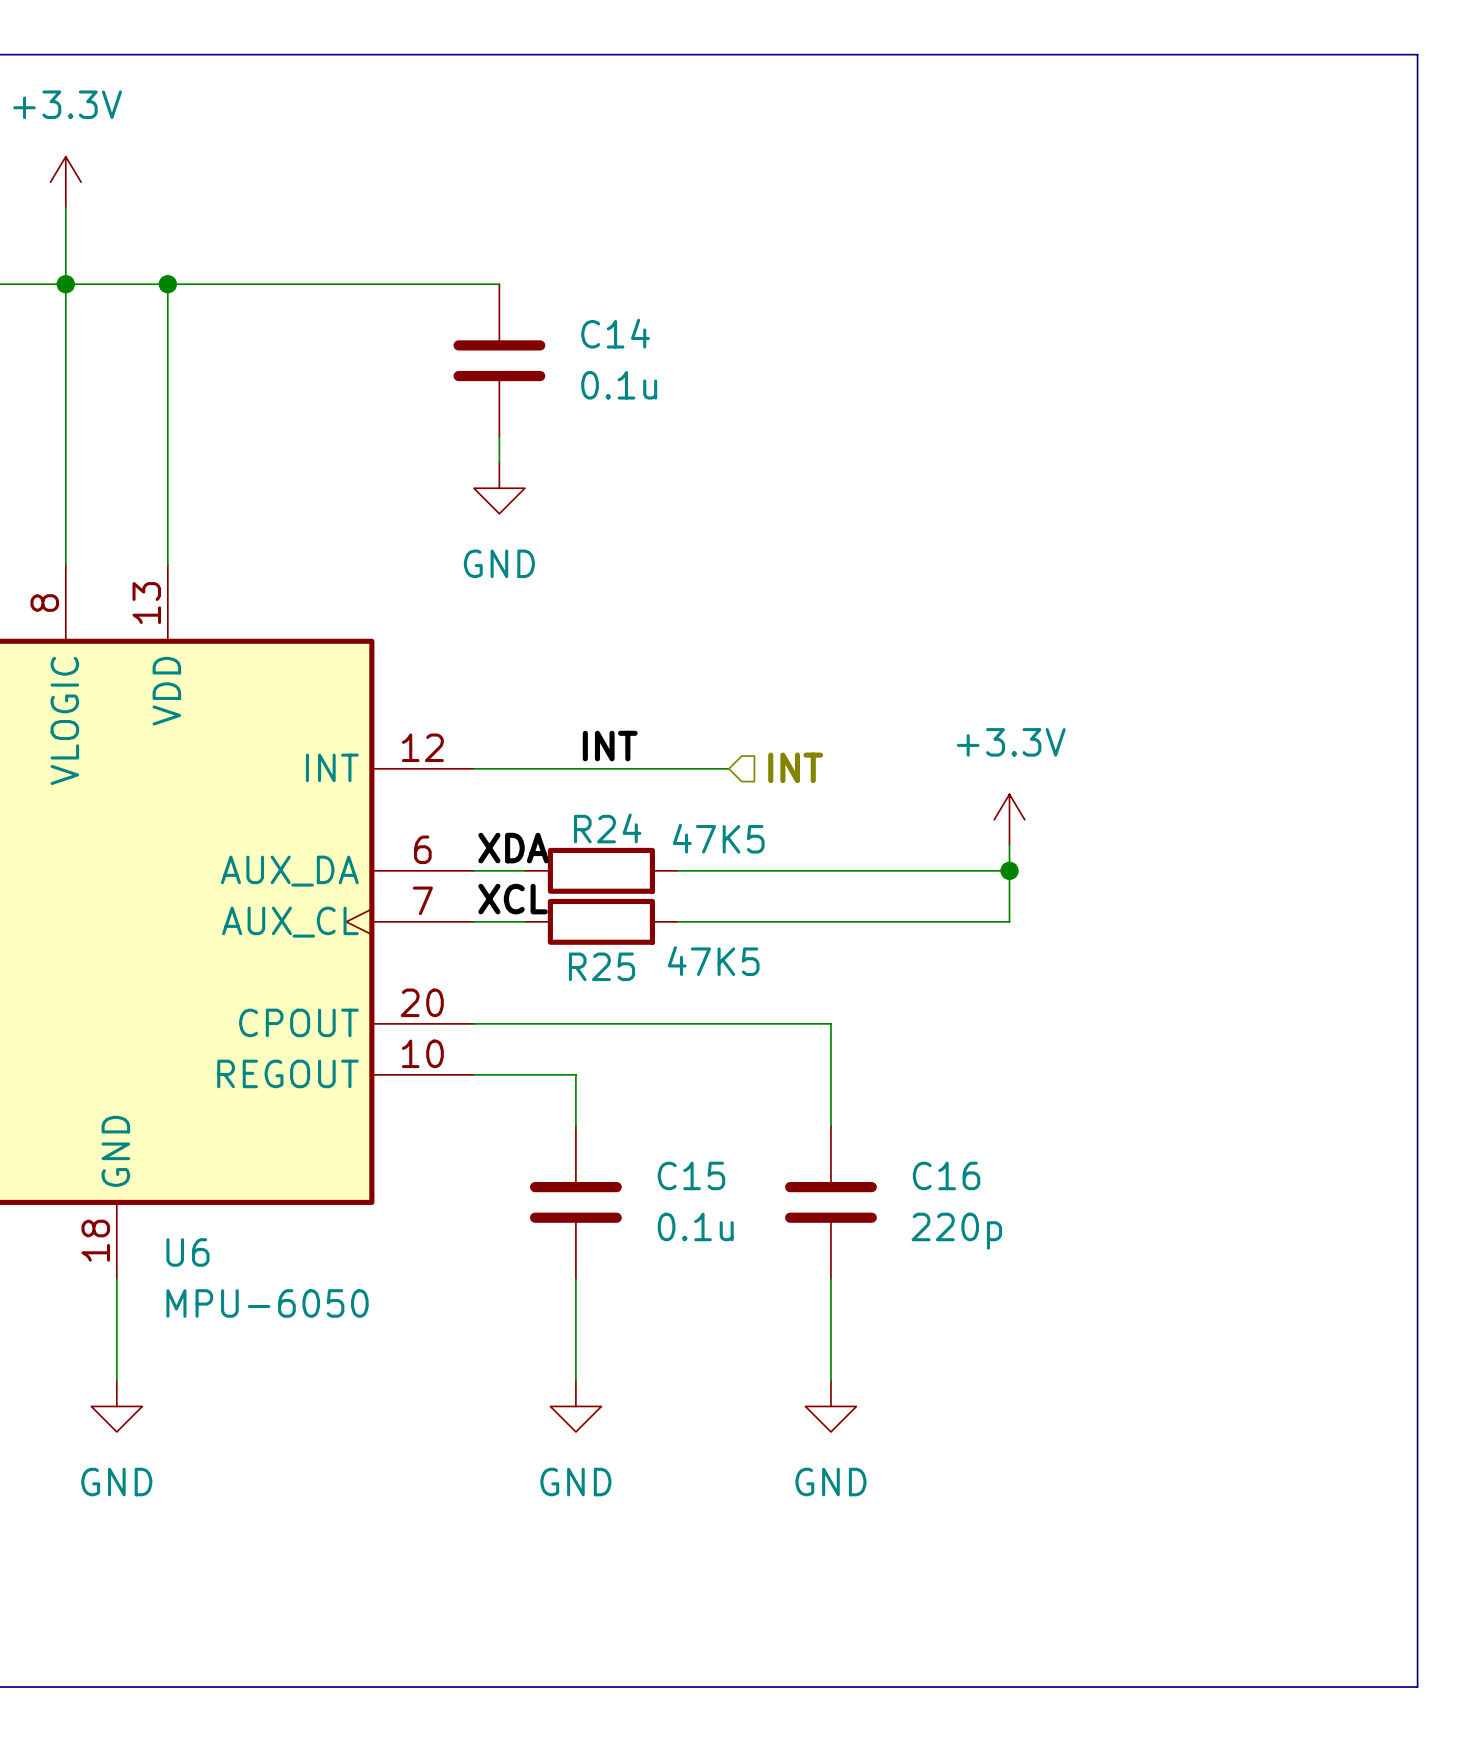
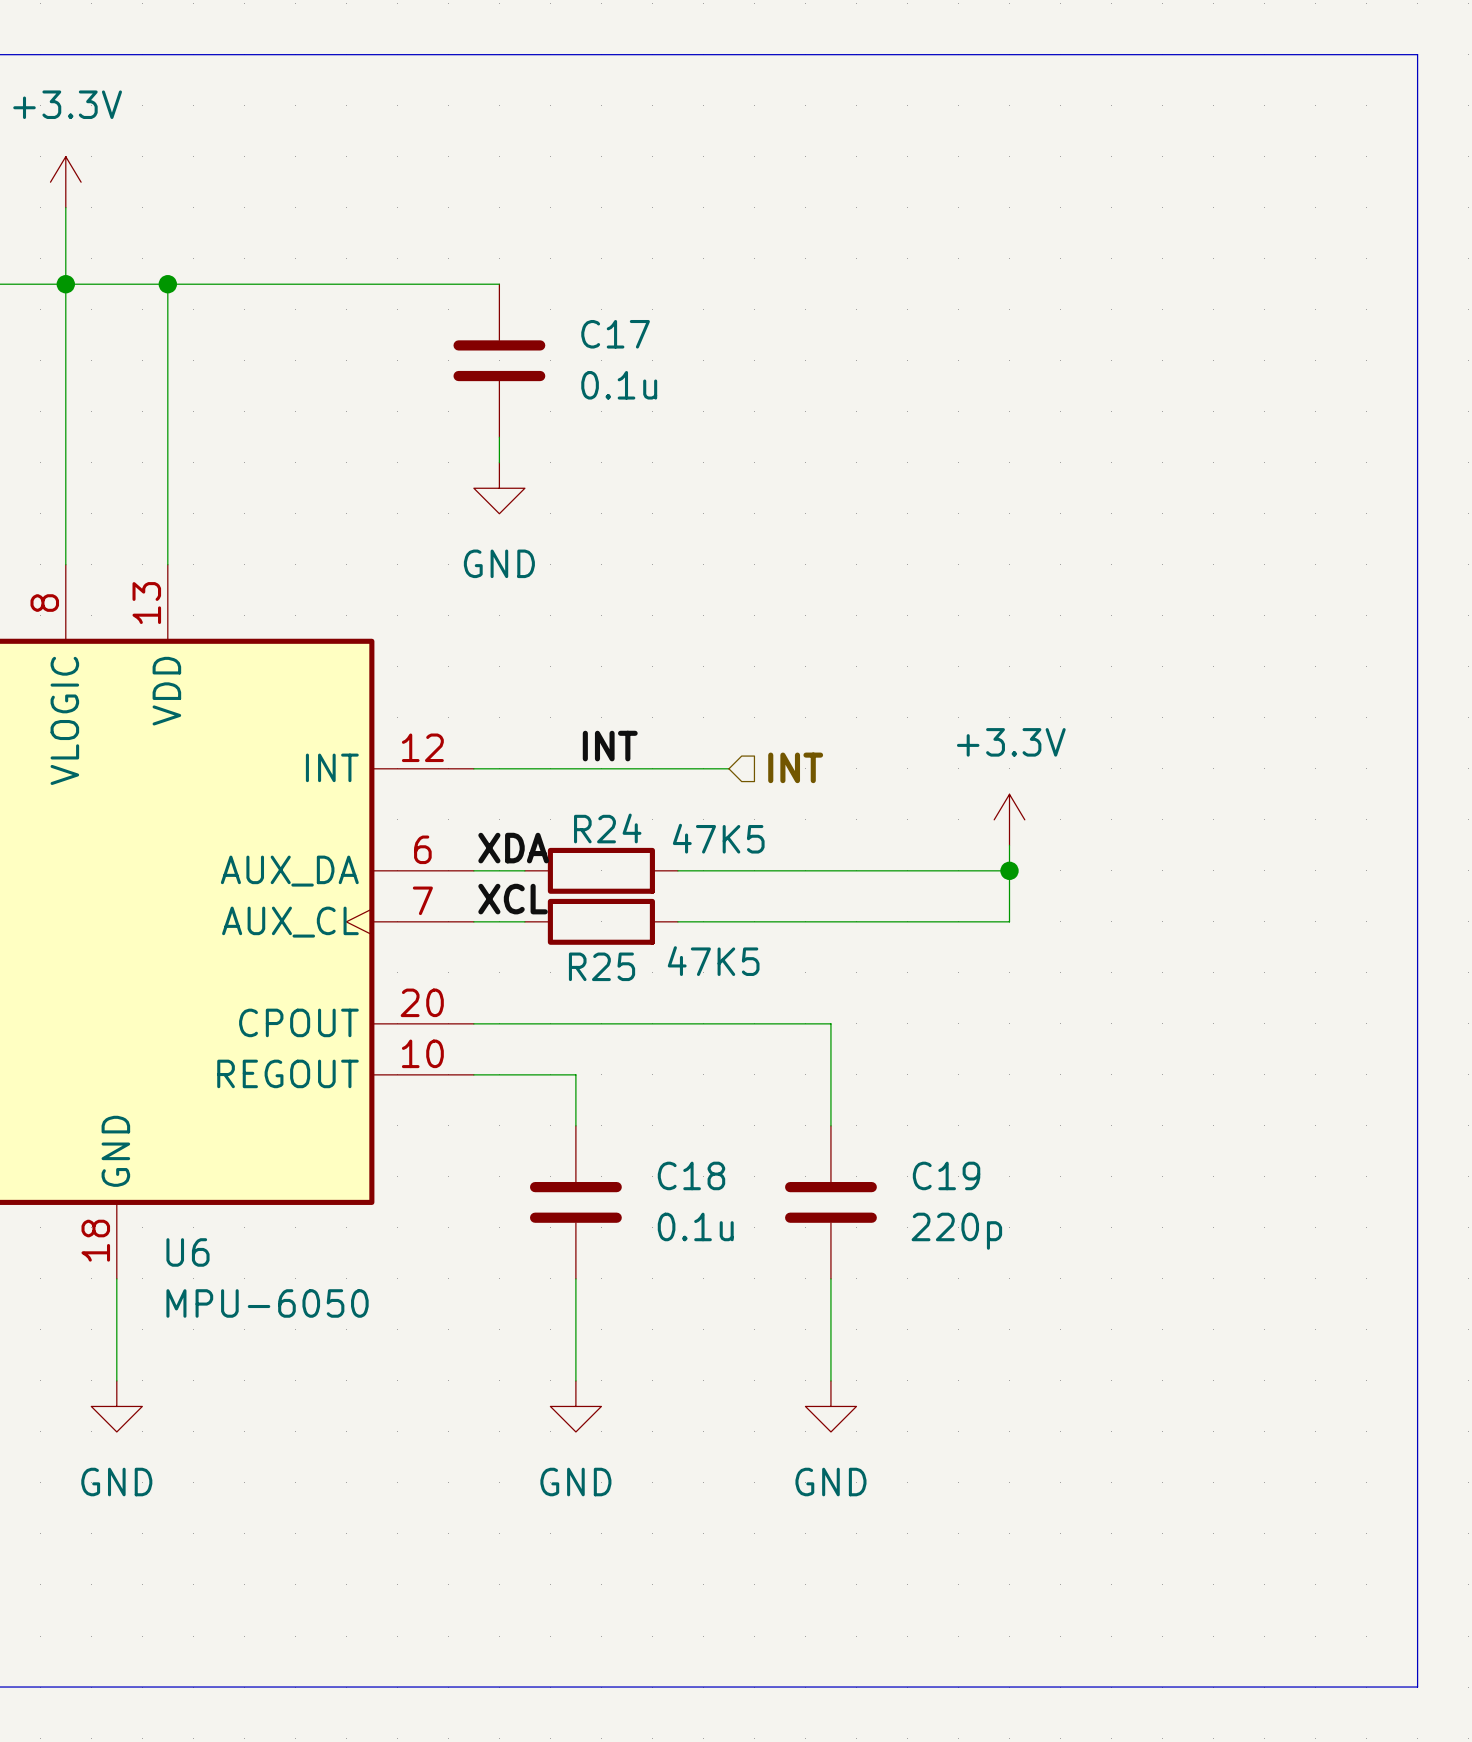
C14 name: C14 (615, 333) -> C17 (615, 334)
C15 name: C15 (691, 1175) -> C18 (691, 1175)
C16 name: C16 (946, 1175) -> C19 (946, 1175)

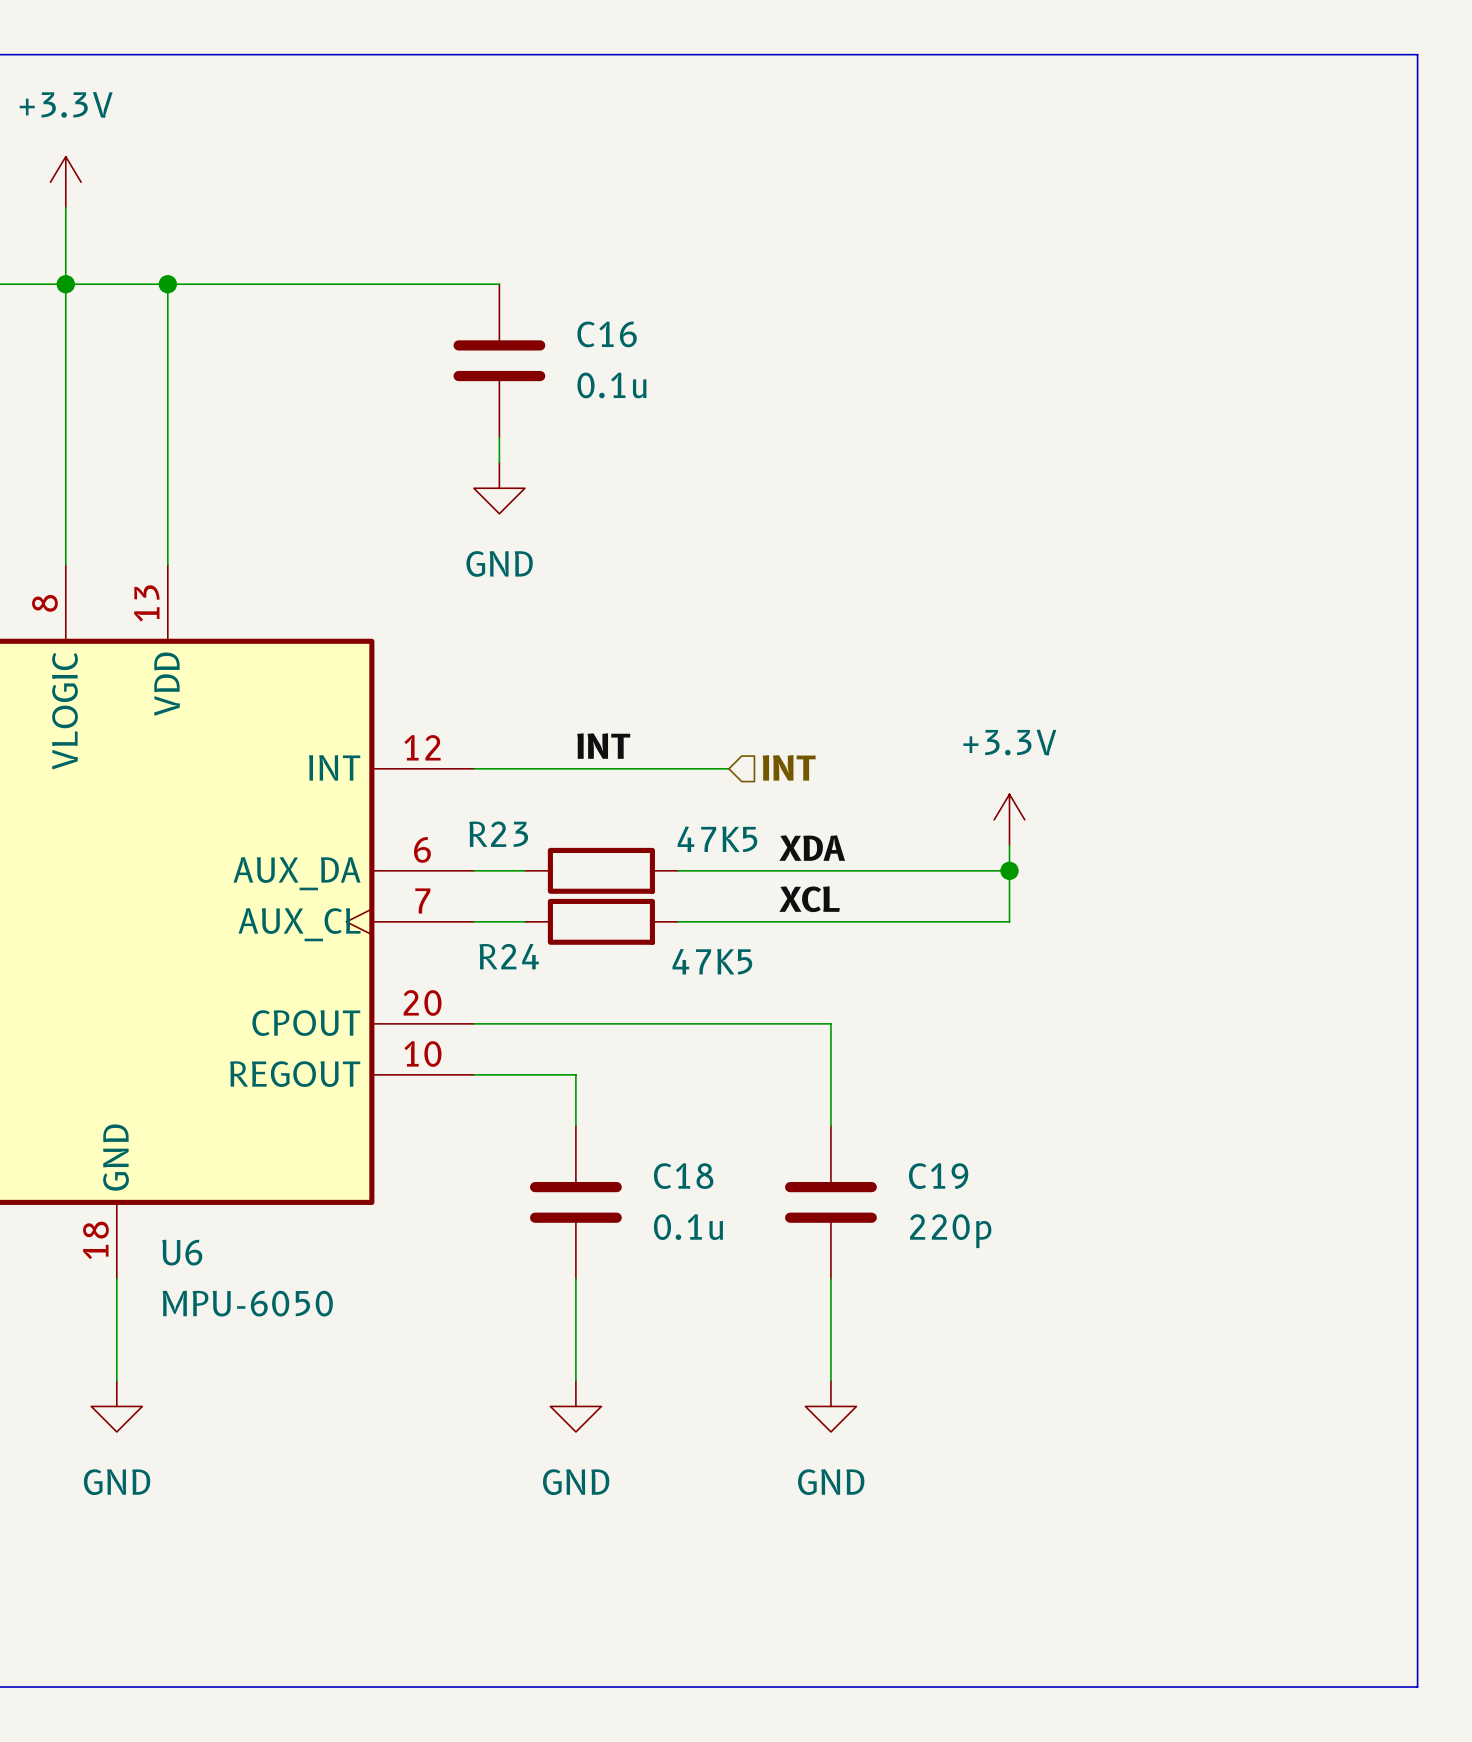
C17 name: C17 (615, 334) -> C16 (607, 334)
R24 name: R24 (607, 828) -> R23 (498, 834)
label position: XDA (513, 848) -> XDA (812, 848)
label position: XCL (513, 899) -> XCL (809, 899)
R25 name: R25 (602, 966) -> R24 (509, 956)

